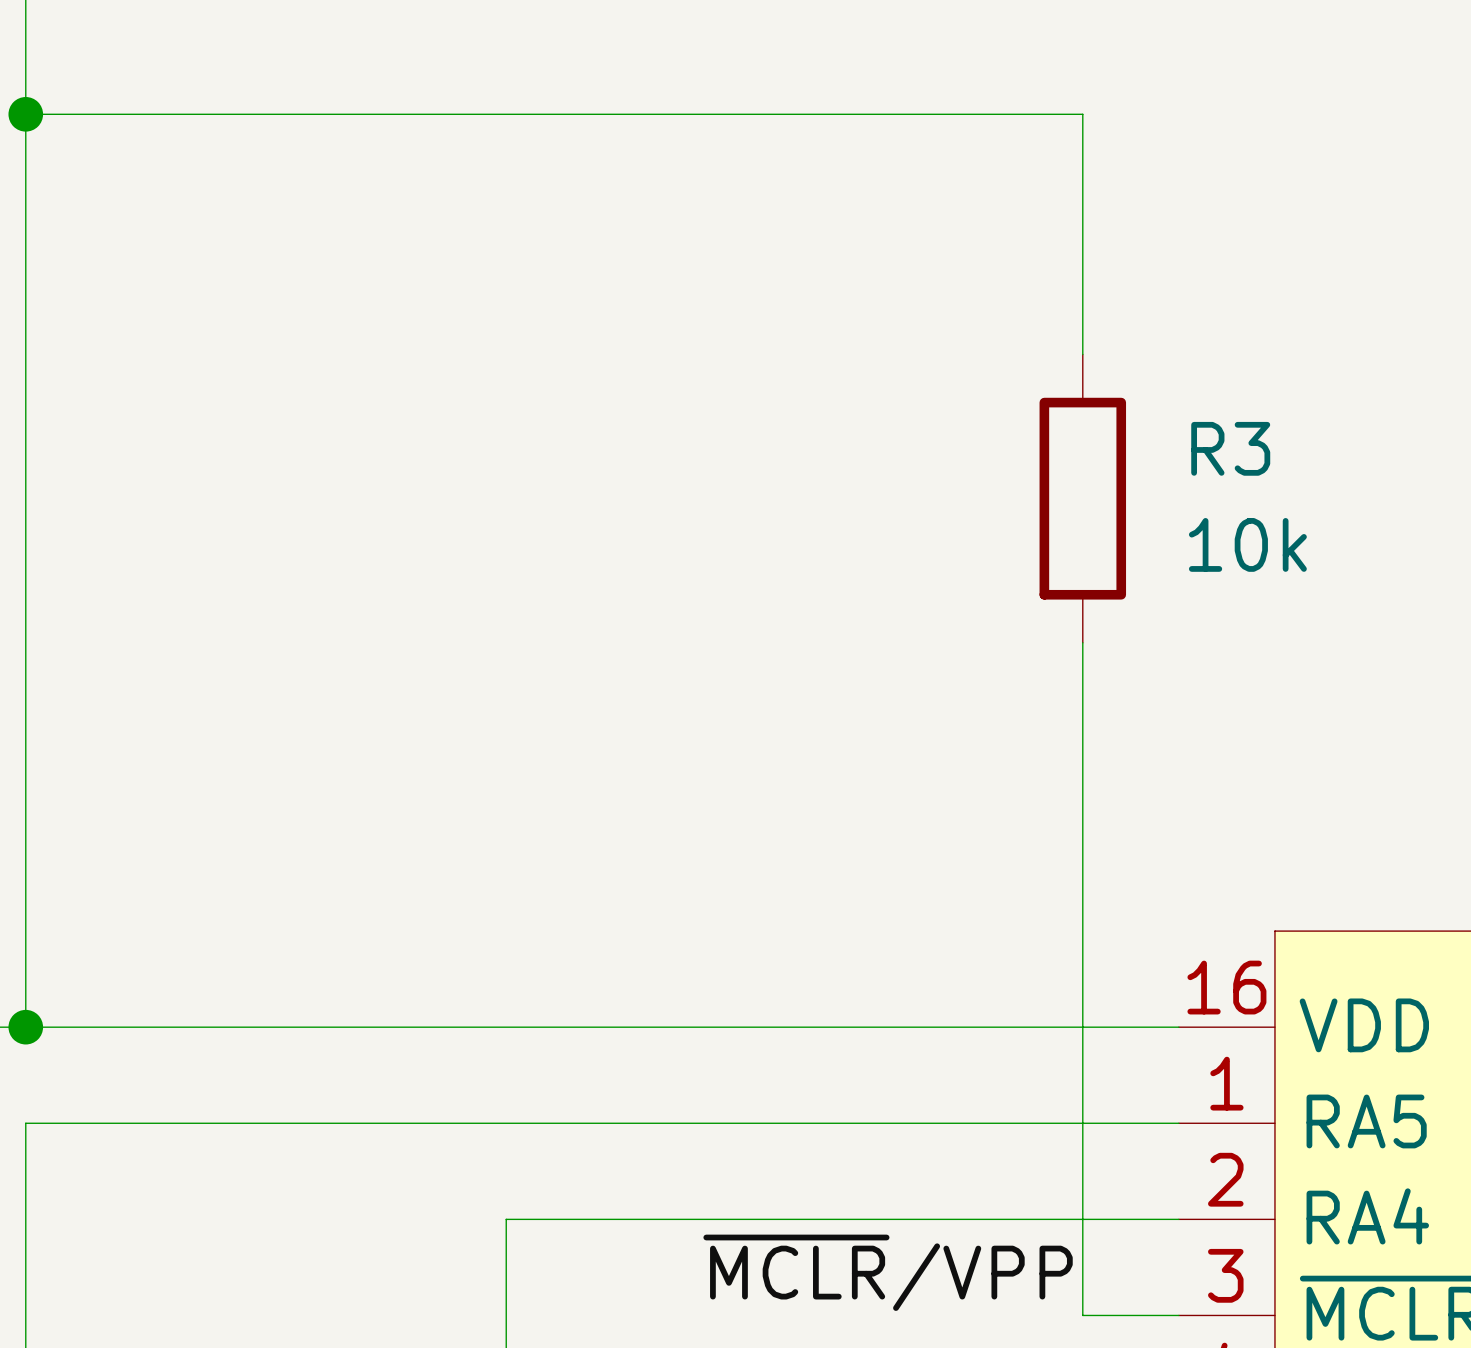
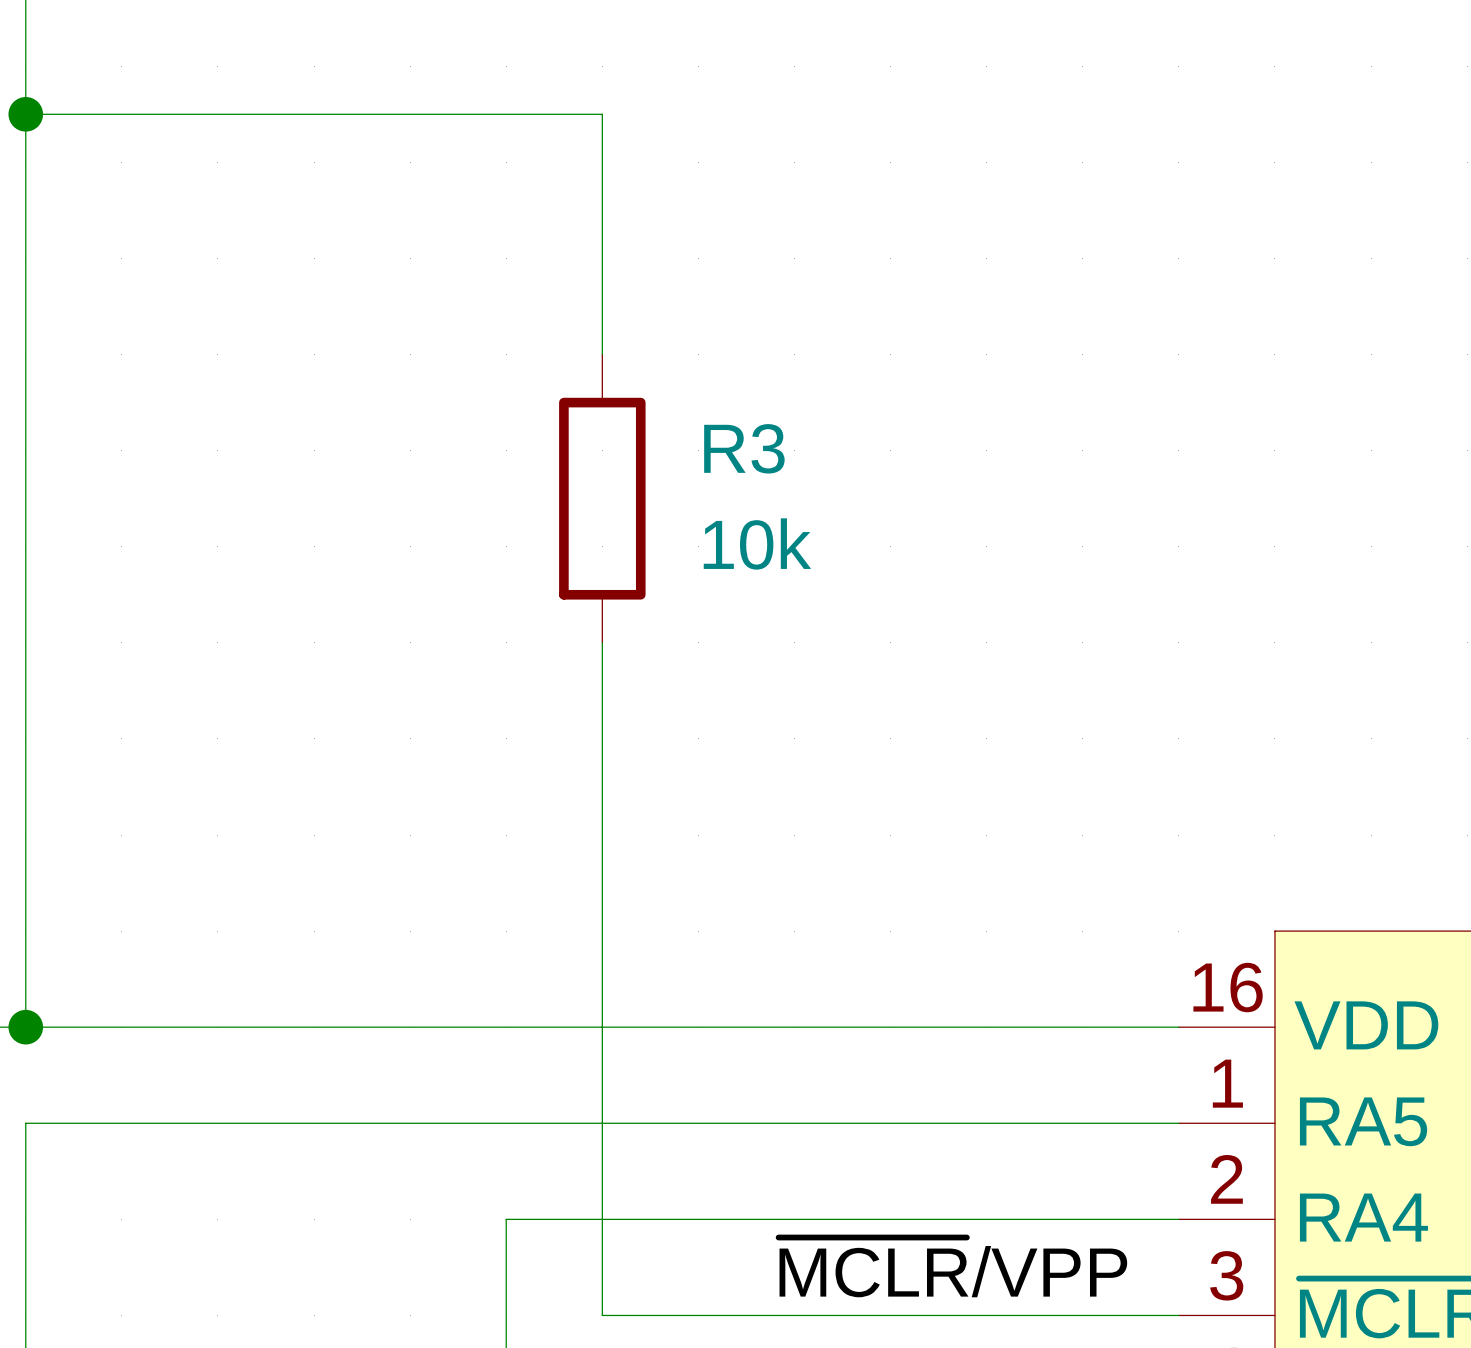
wire: (602, 114) (1082, 114) (1082, 354) -> (602, 114) (602, 354)
R3 position: (1082, 498) -> (602, 498)
wire: (1082, 642) (1082, 1315) -> (602, 642) (602, 1315) (1082, 1315)
label position: ~{MCLR}/VPP (888, 1272) -> ~{MCLR}/VPP (952, 1267)

